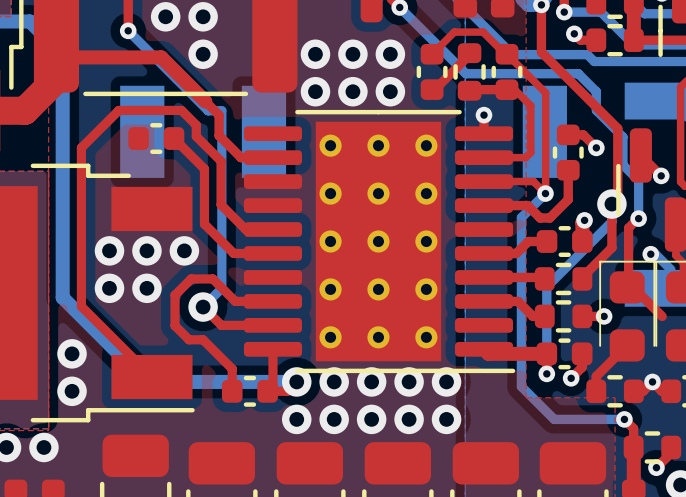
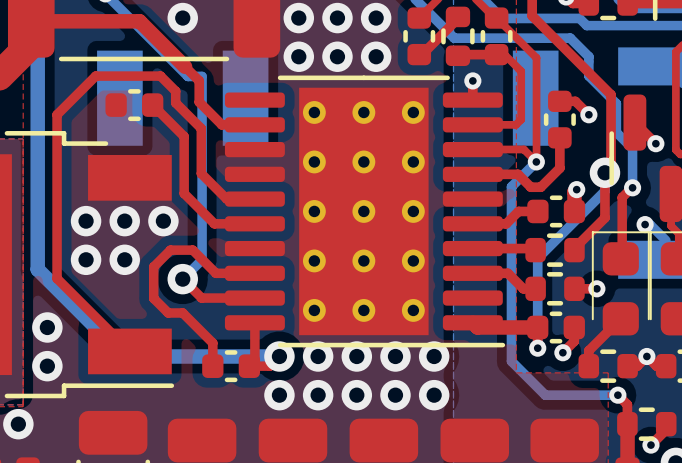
top track: (633, 287) (662, 316) -> none

